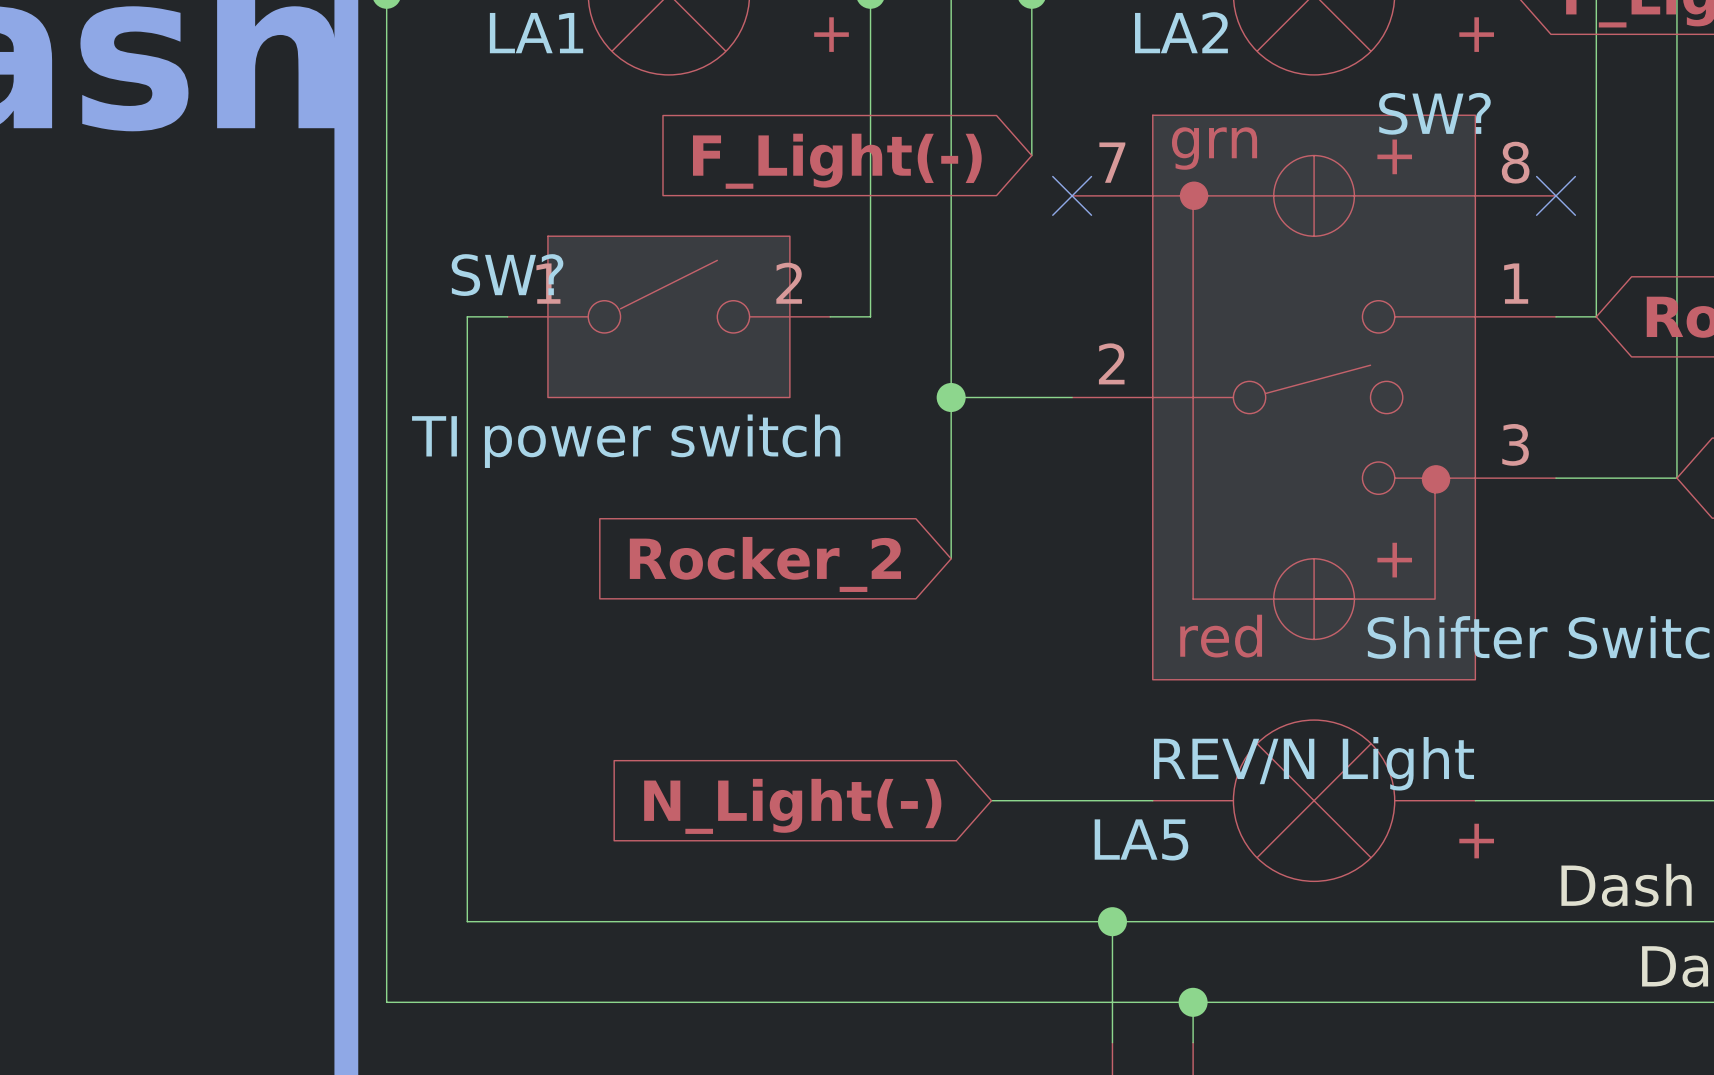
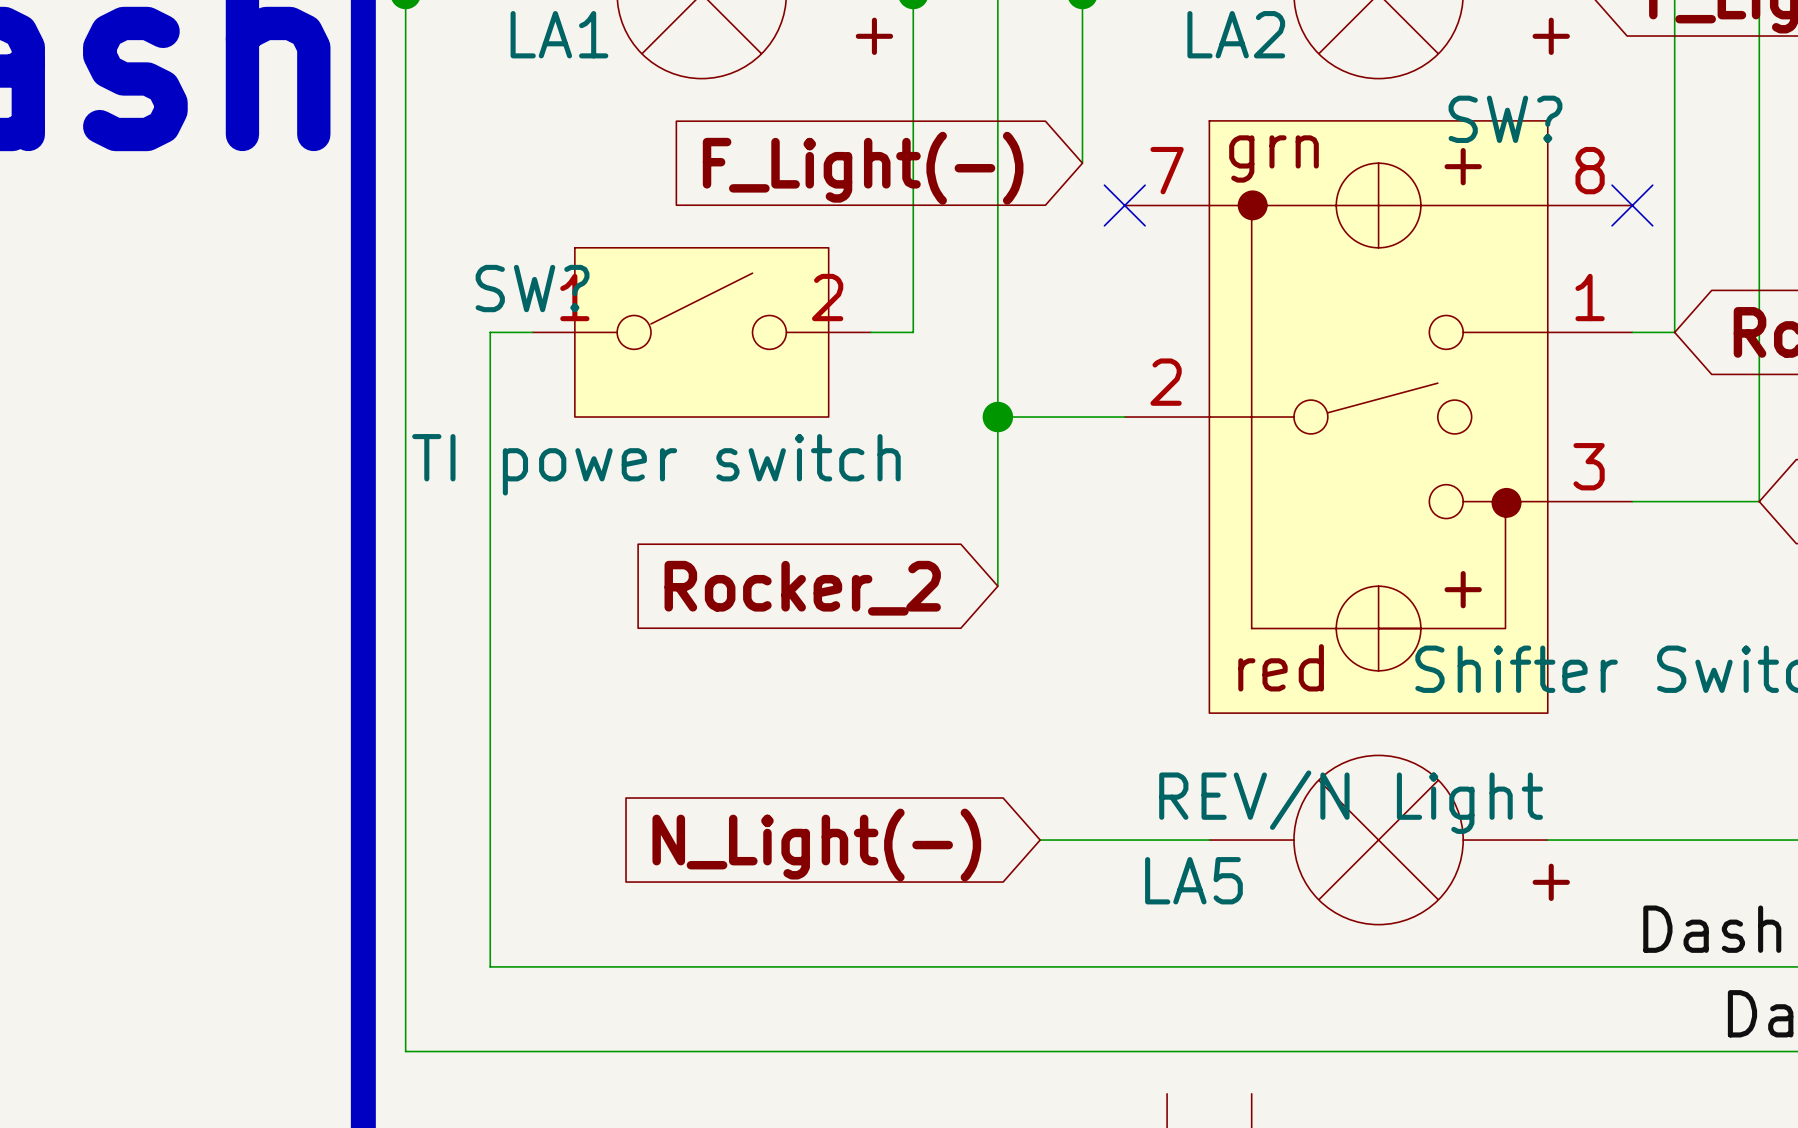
wire: (1112, 921) (1112, 1042) -> none
junction: (1112, 921) -> none
wire: (1193, 1002) (1193, 1042) -> none
junction: (1193, 1002) -> none

